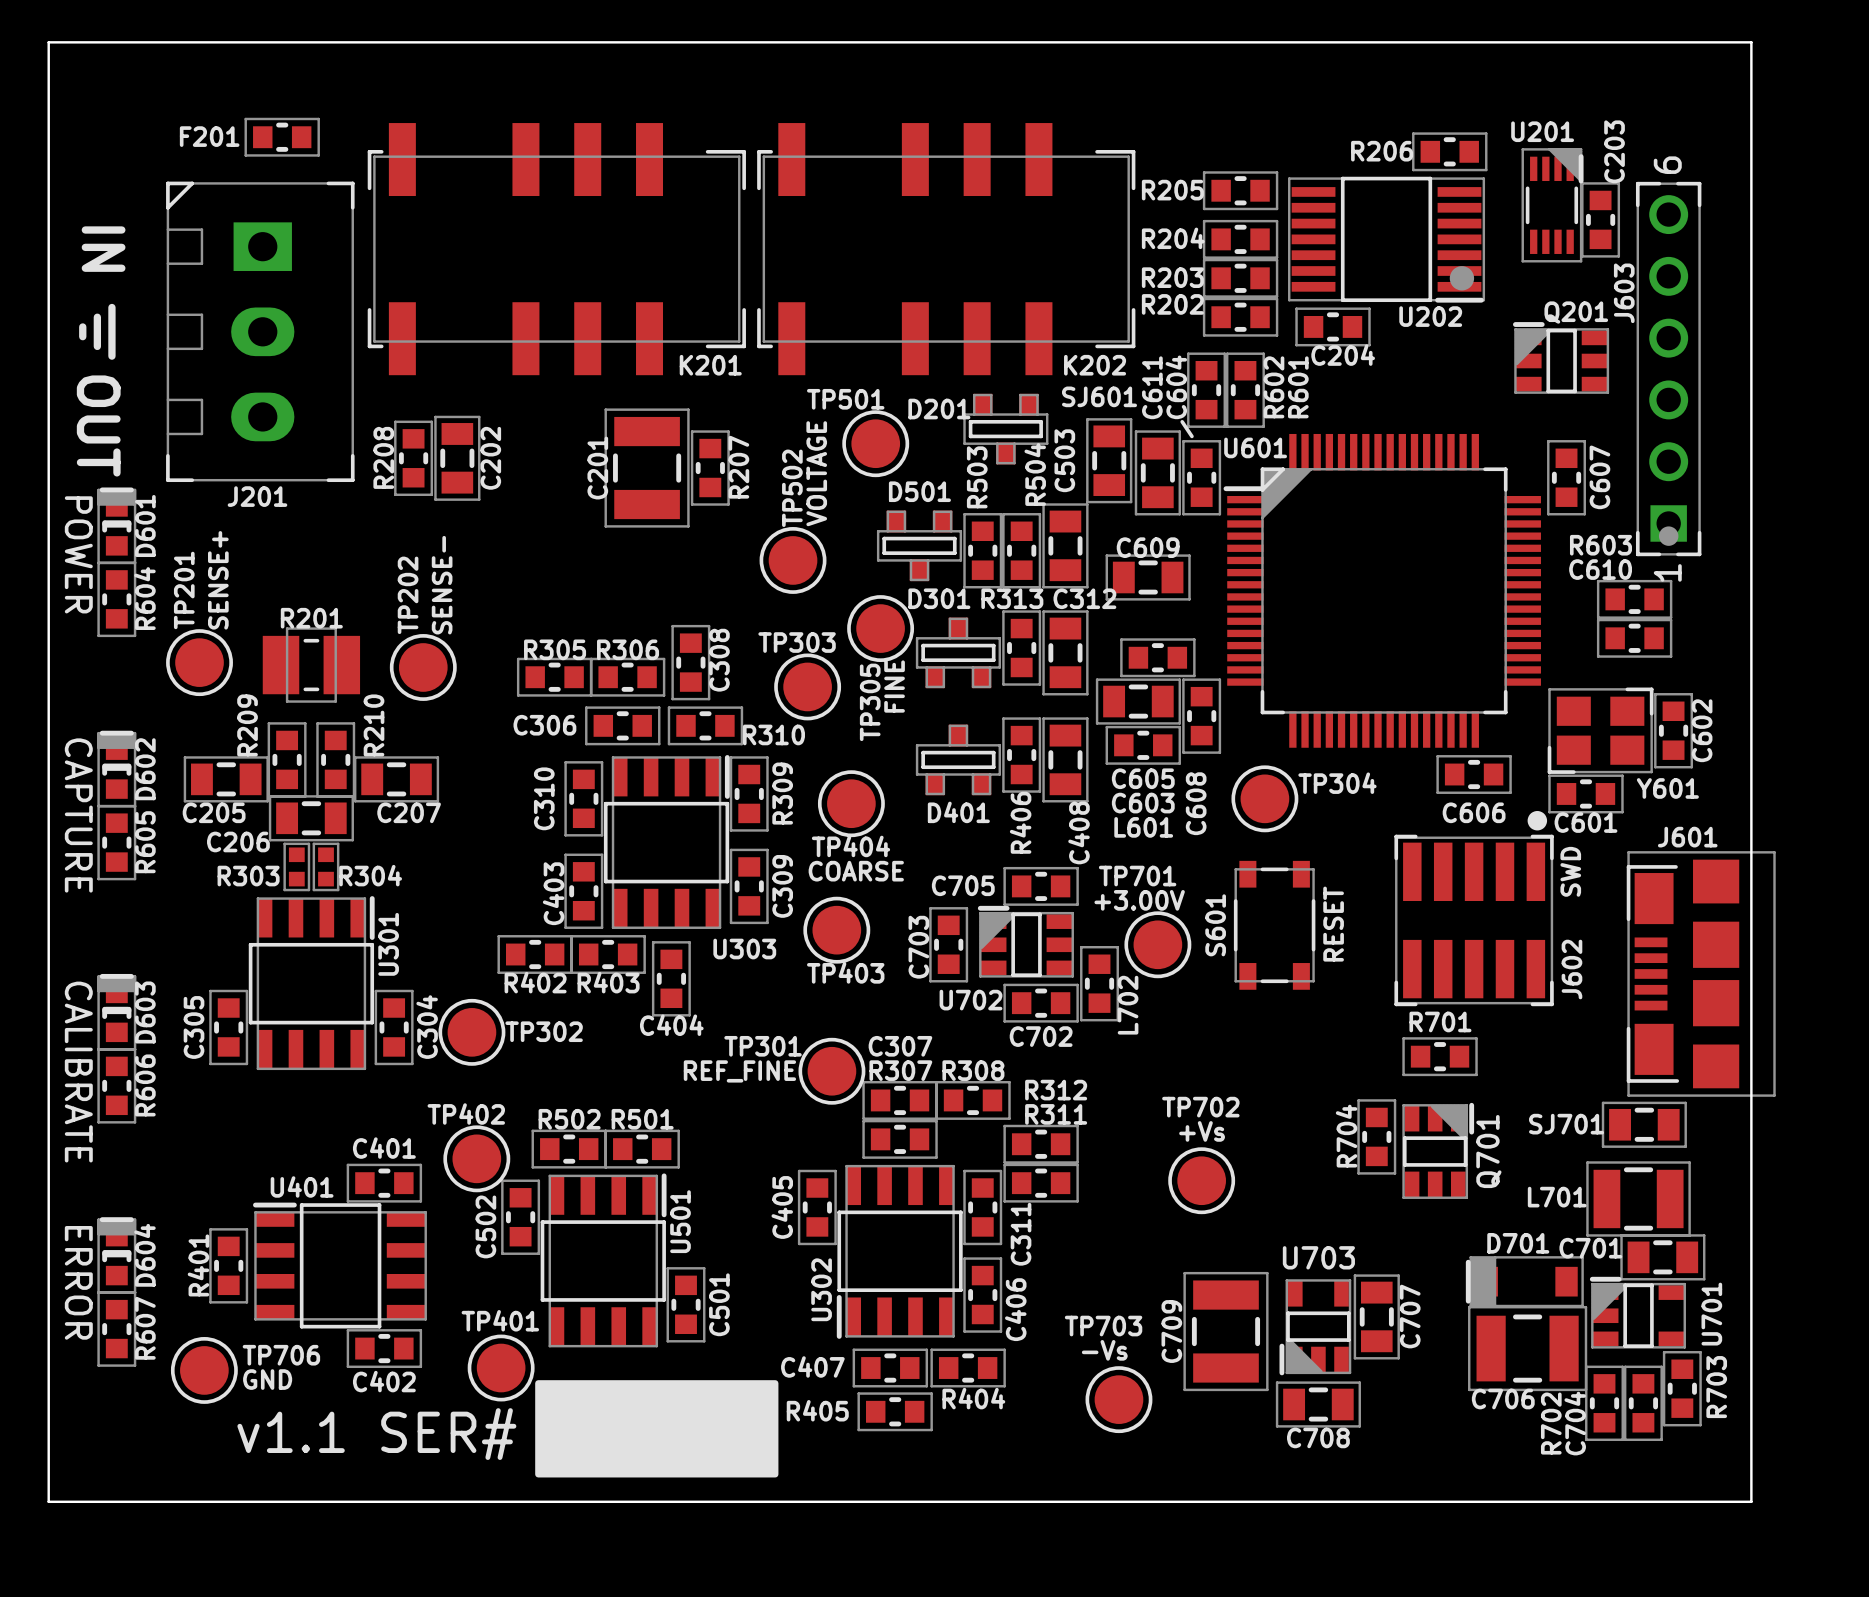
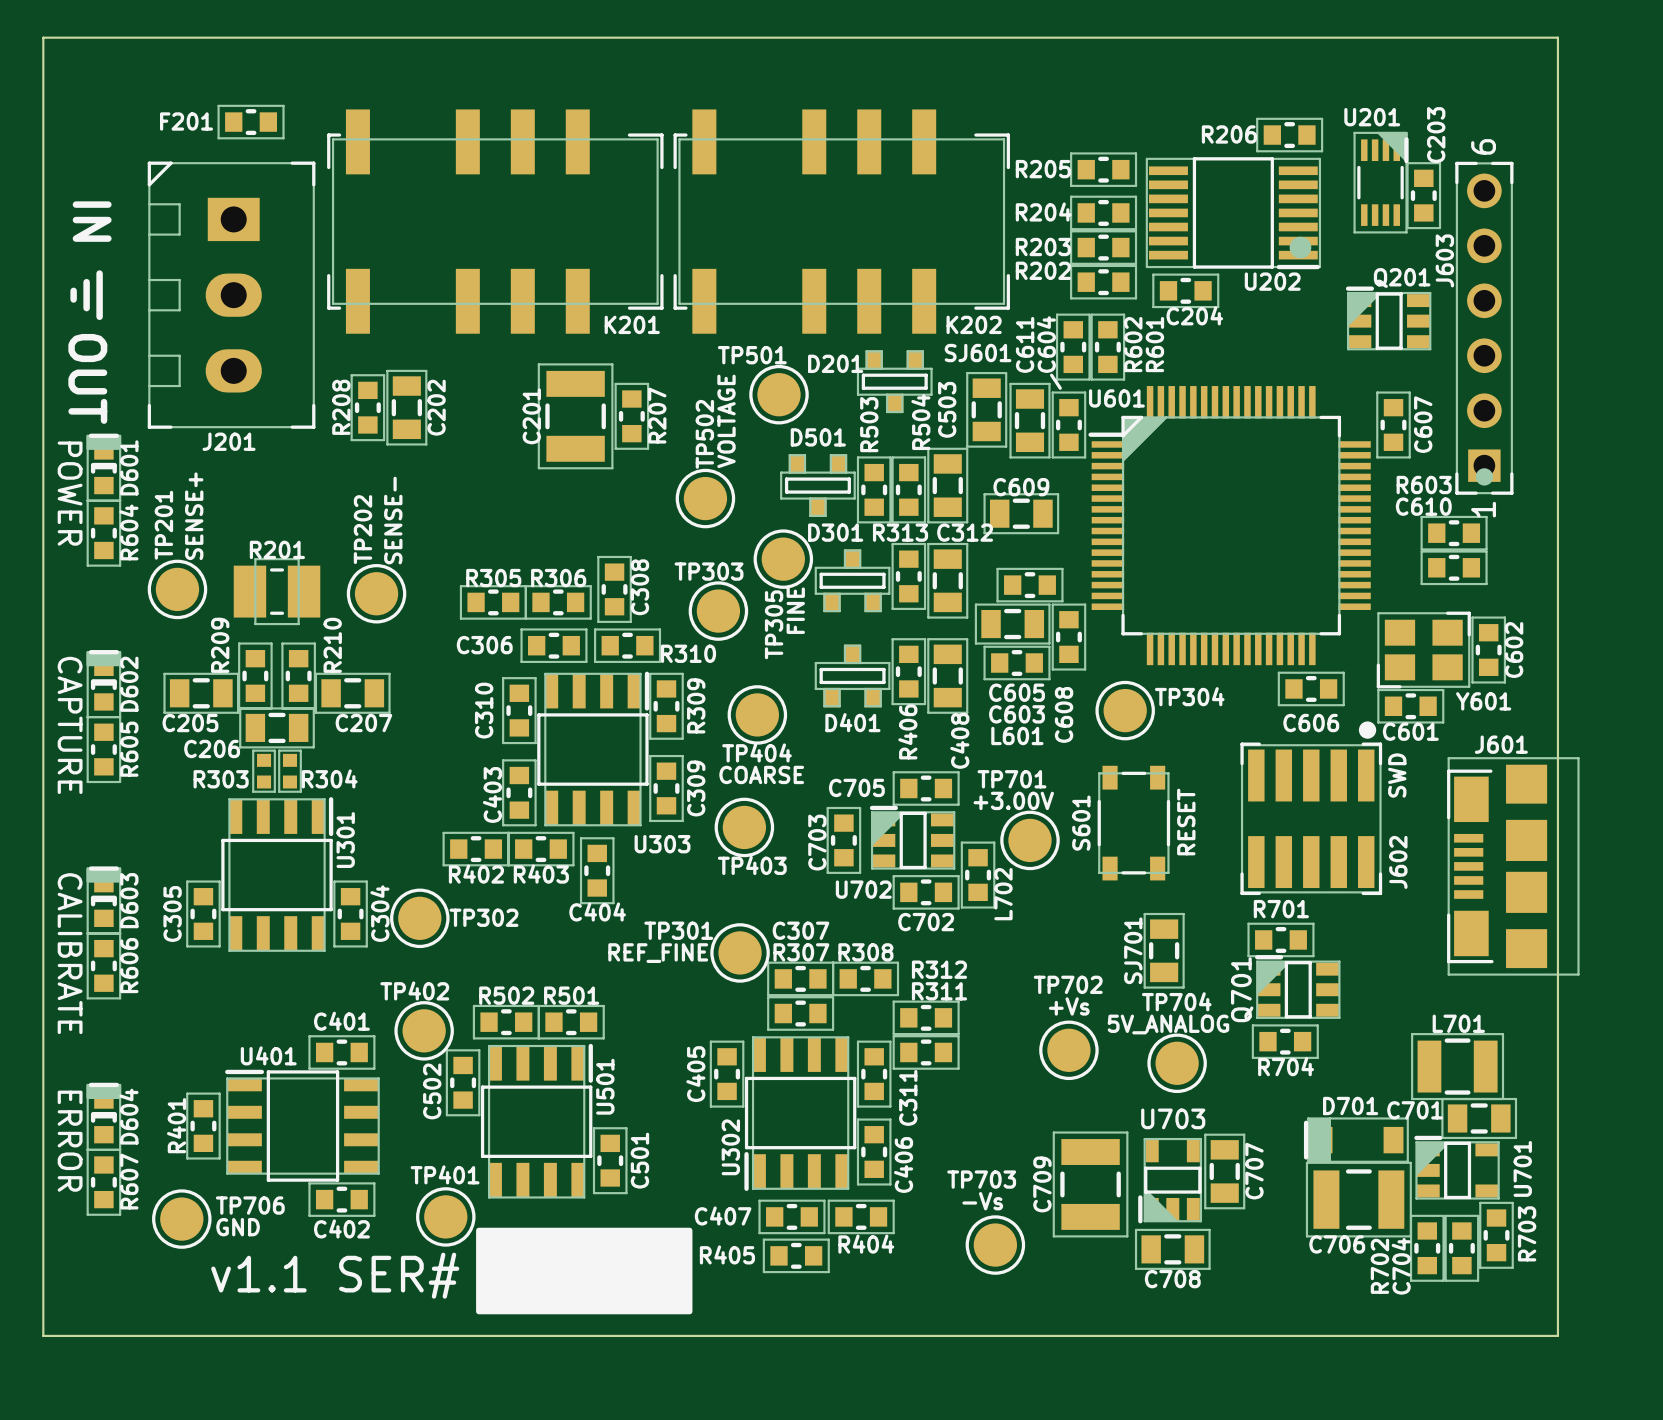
SJ701 rotation: 0° (1644, 1124) -> 90° clockwise (1164, 950)
SJ701 position: (1644, 1124) -> (1164, 950)
R704 rotation: 0° (1376, 1136) -> 90° clockwise (1285, 1041)
R704 position: (1376, 1136) -> (1285, 1041)
Q701 rotation: 0° (1438, 1150) -> 90° counterclockwise (1297, 987)
Q701 name position: Q701 (1488, 1151) -> Q701 (1242, 989)
TP704: none -> 5V_ANALOG (1177, 1063)
L701 name position: L701 (1557, 1197) -> L701 (1458, 1023)

